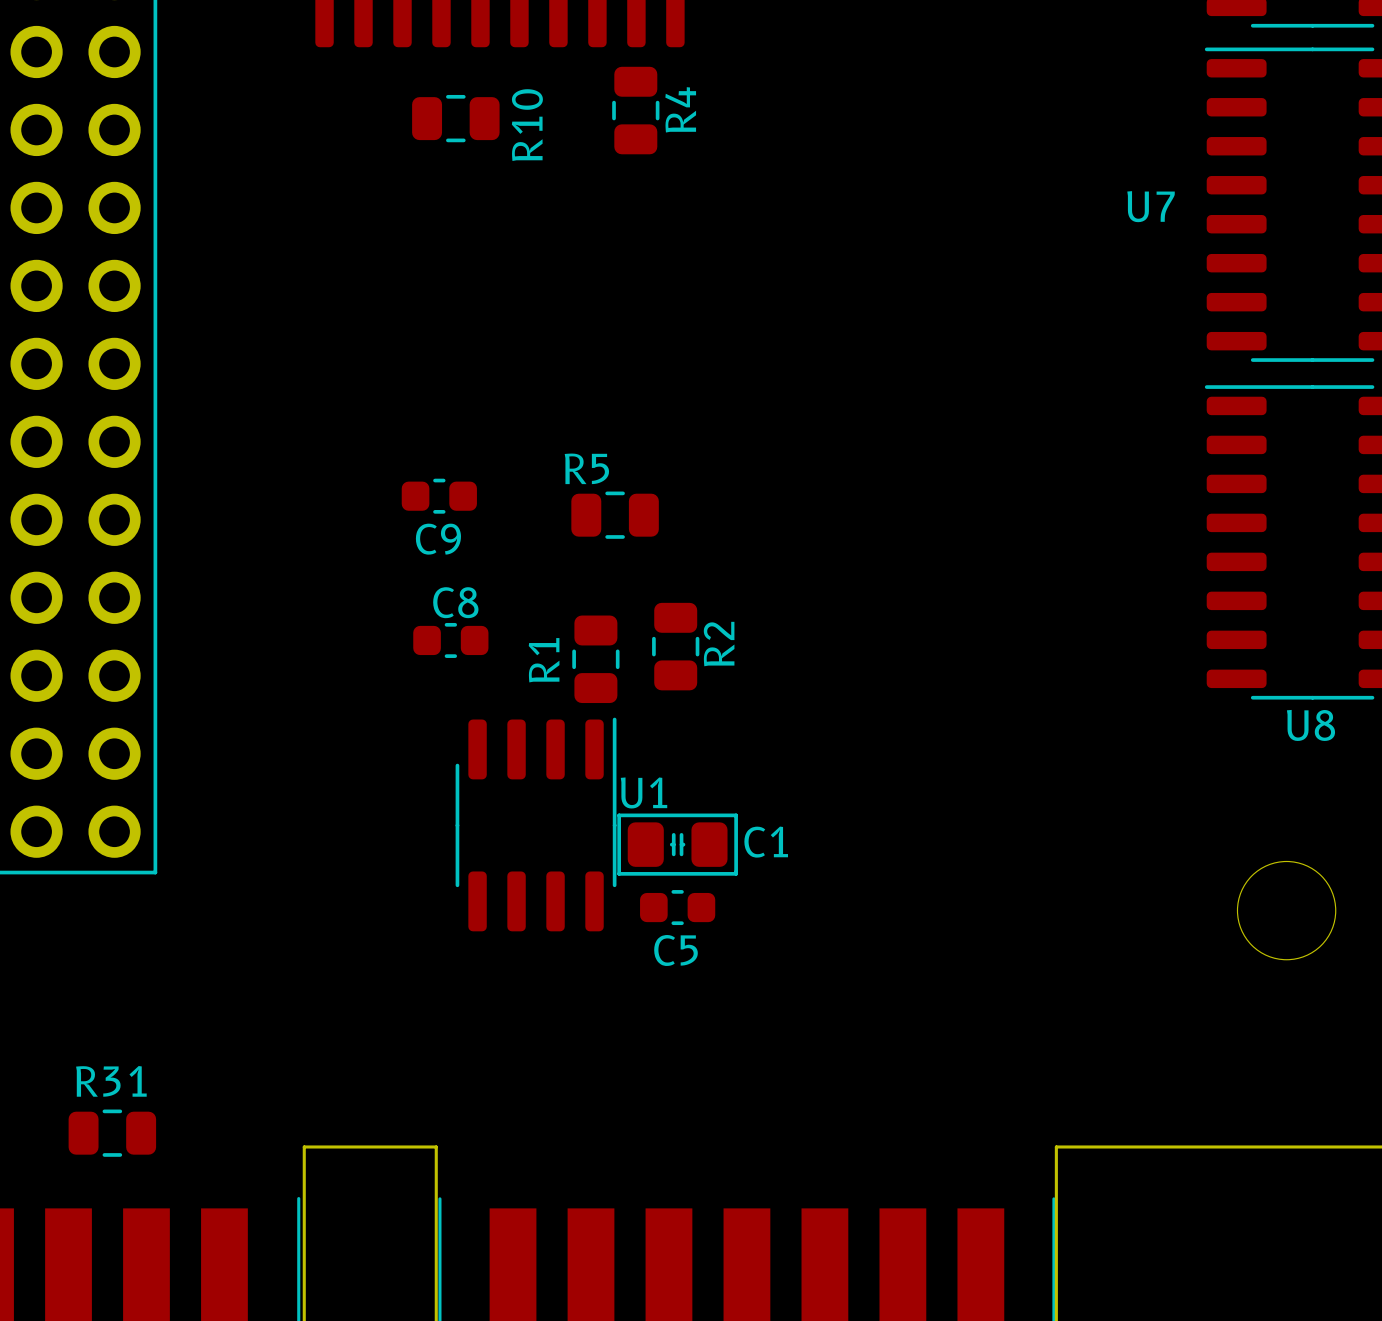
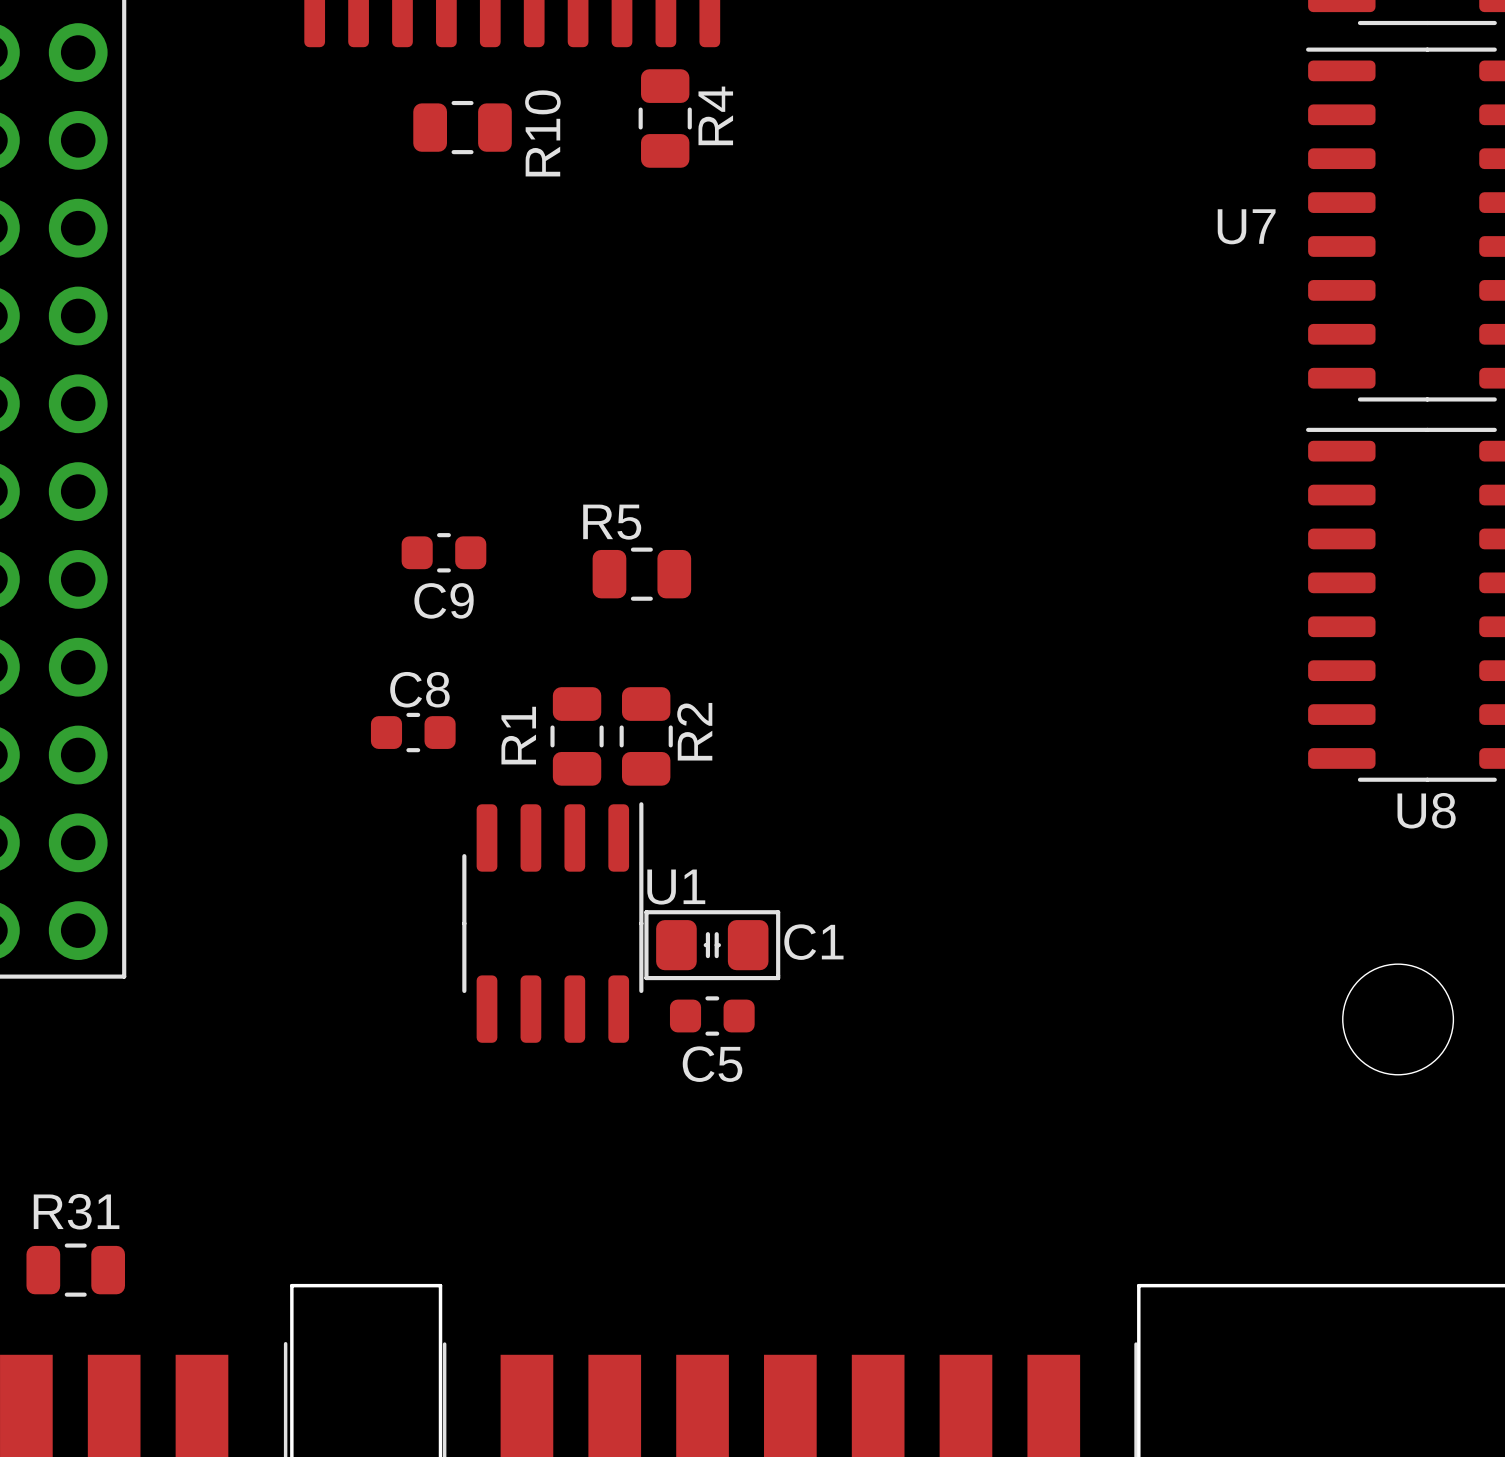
C8 position: (450, 640) -> (413, 732)
R2 position: (675, 646) -> (646, 736)
R1 position: (595, 659) -> (577, 736)

